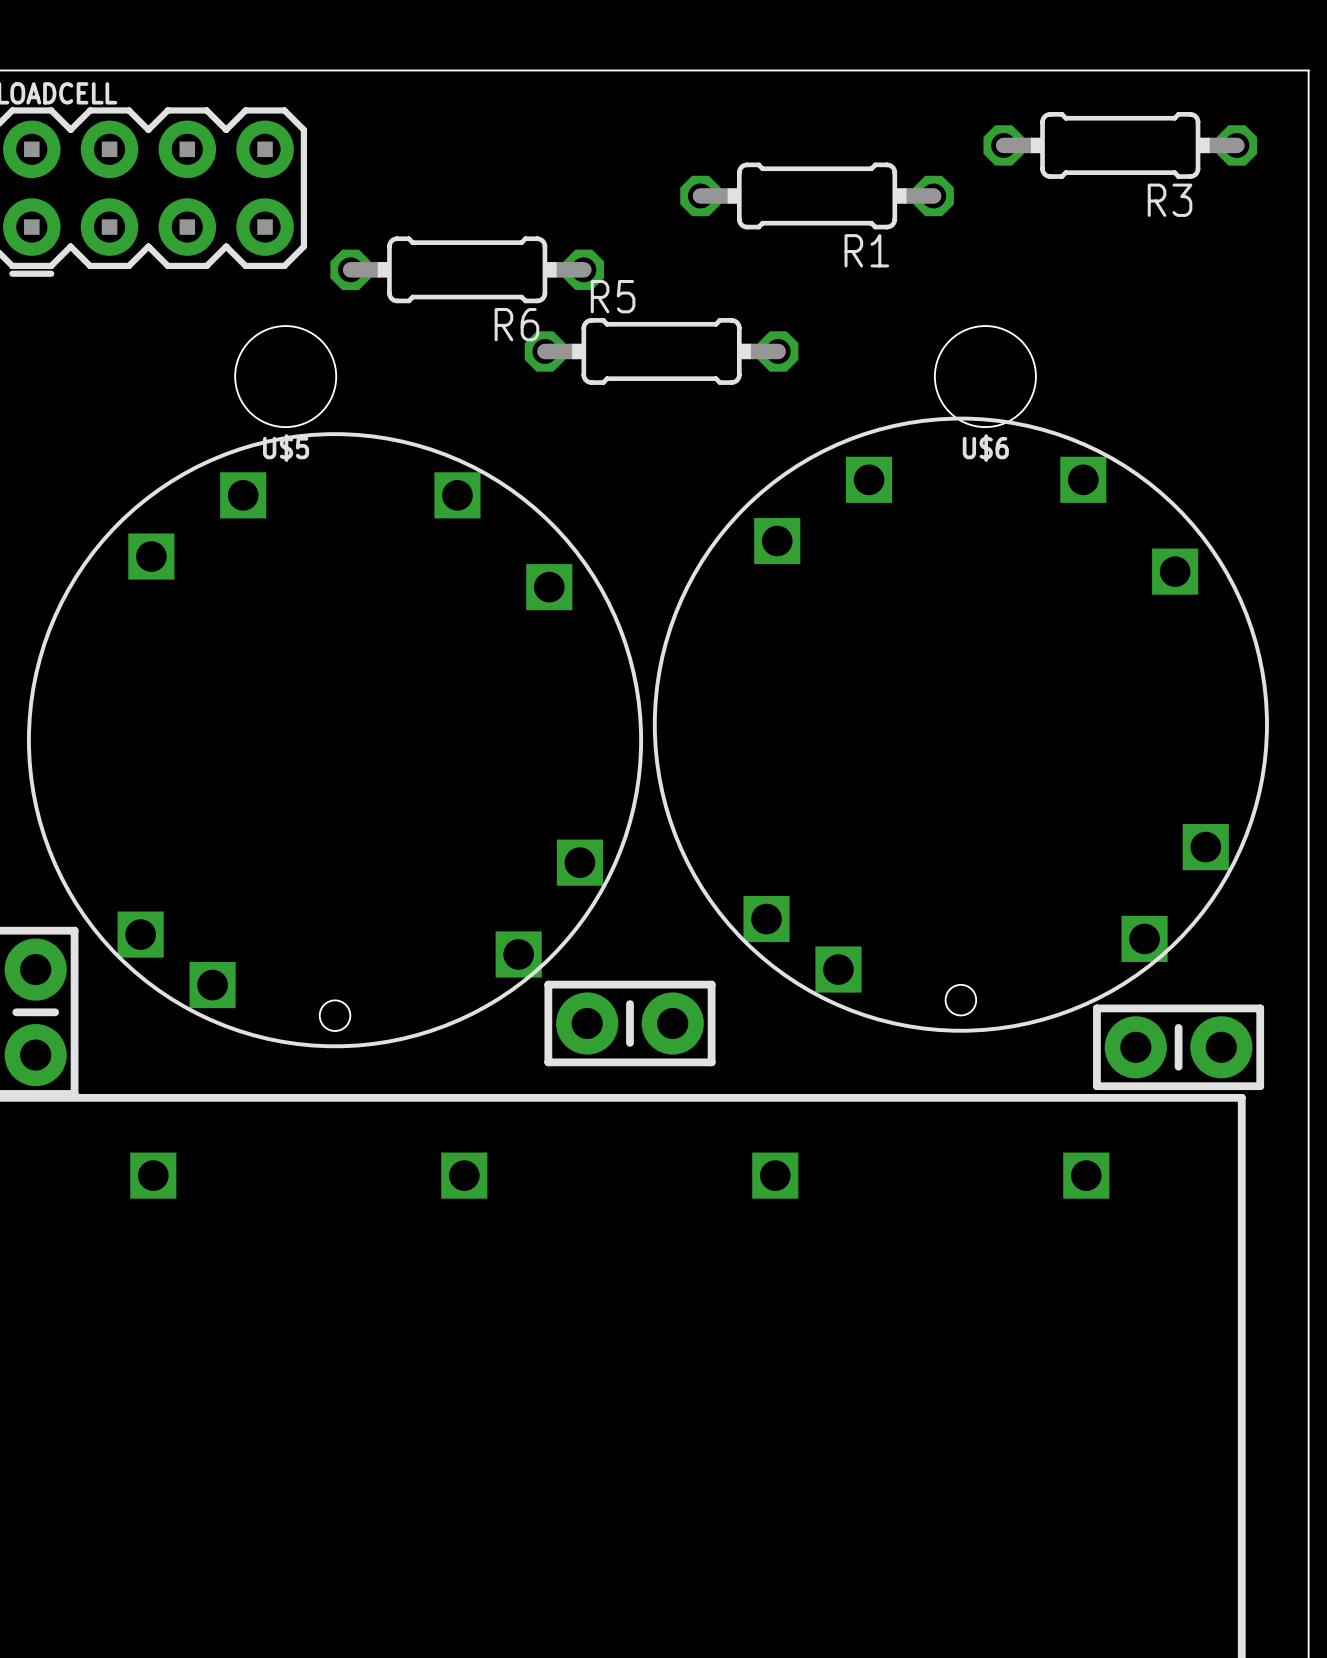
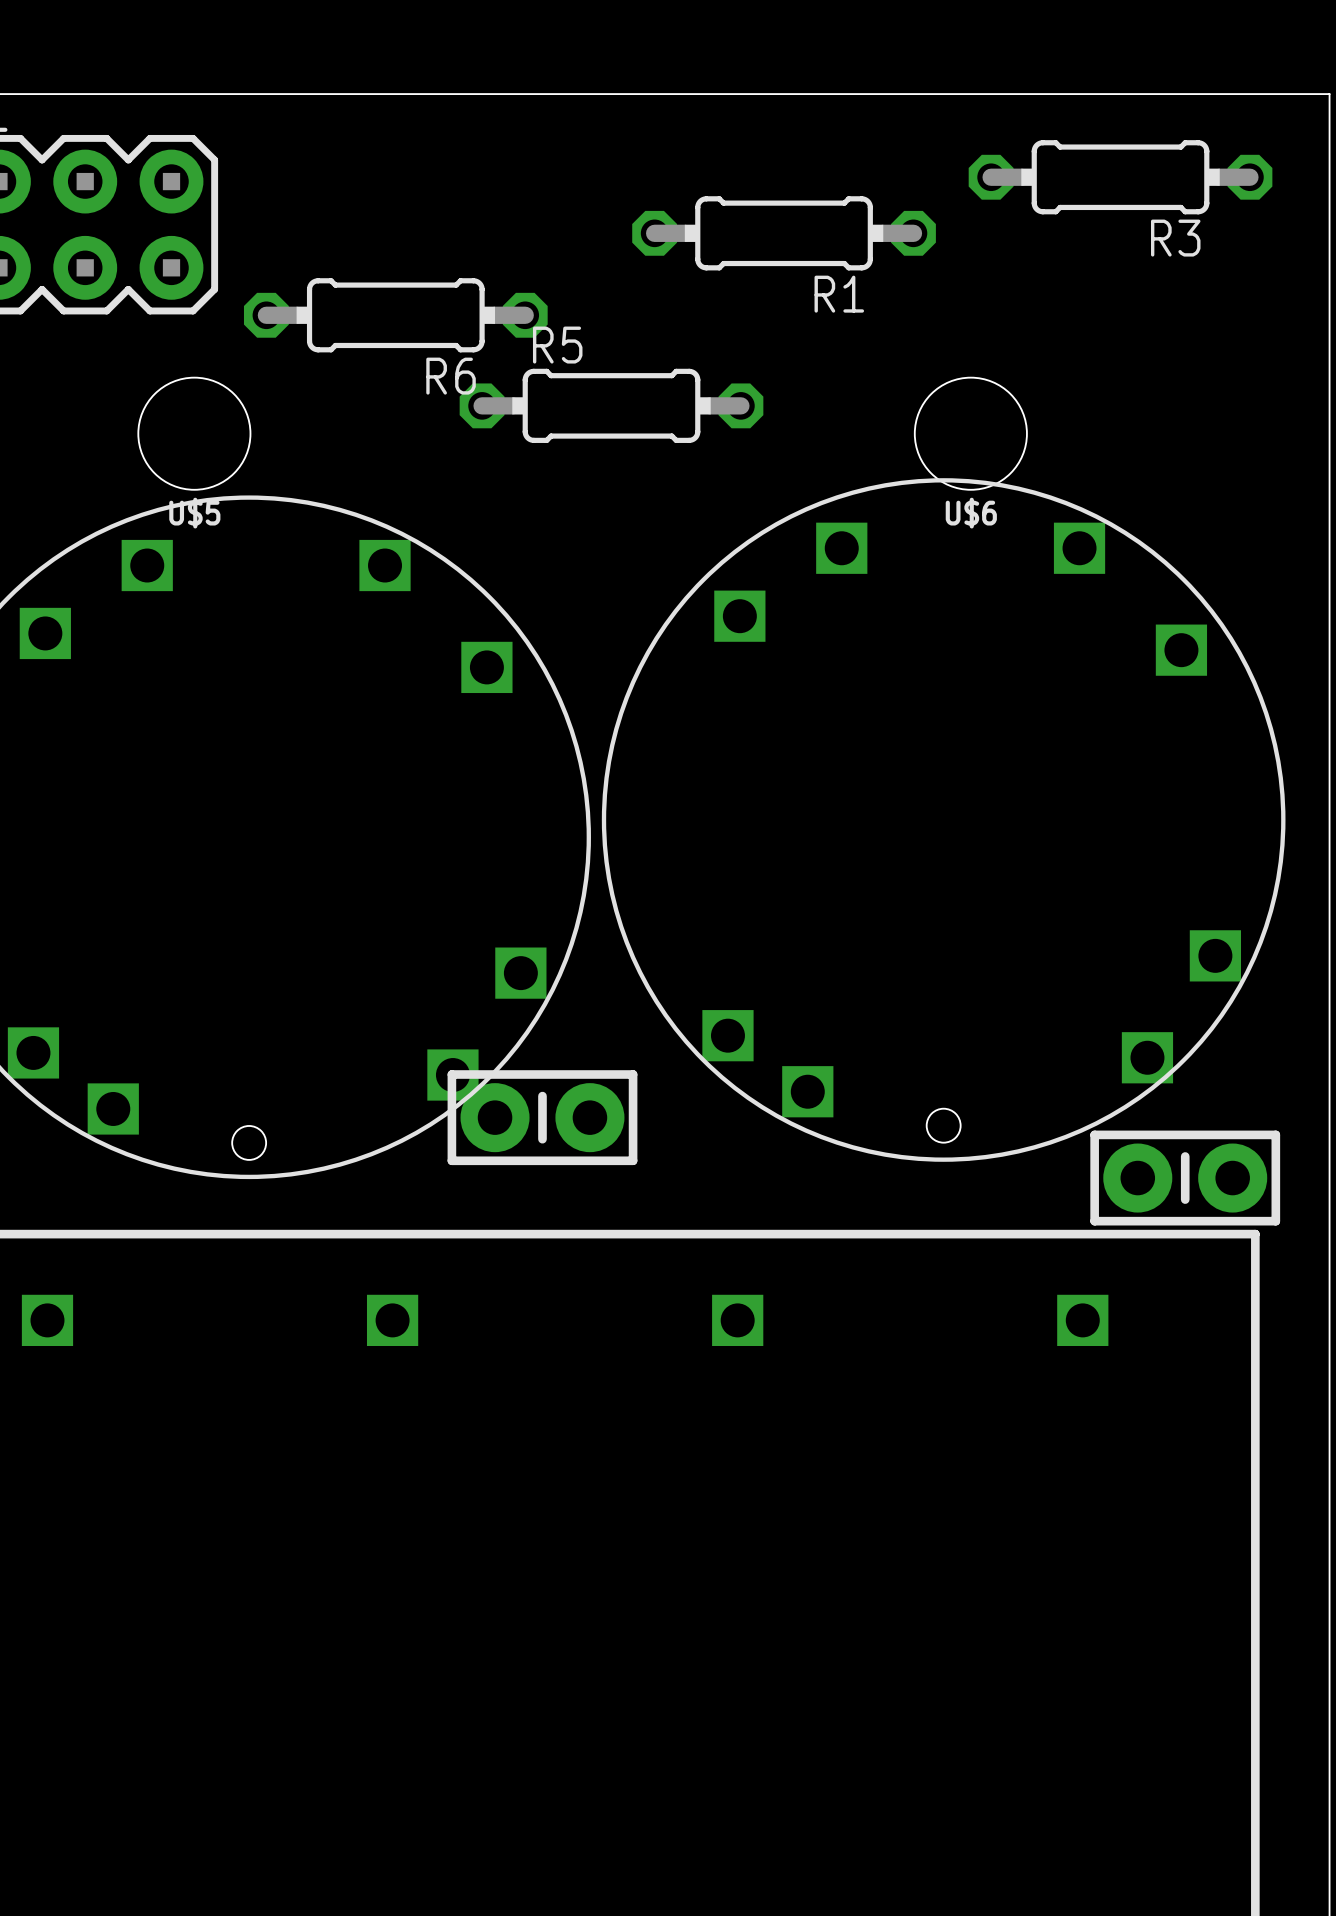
part position: (629, 1023) -> (542, 1117)

